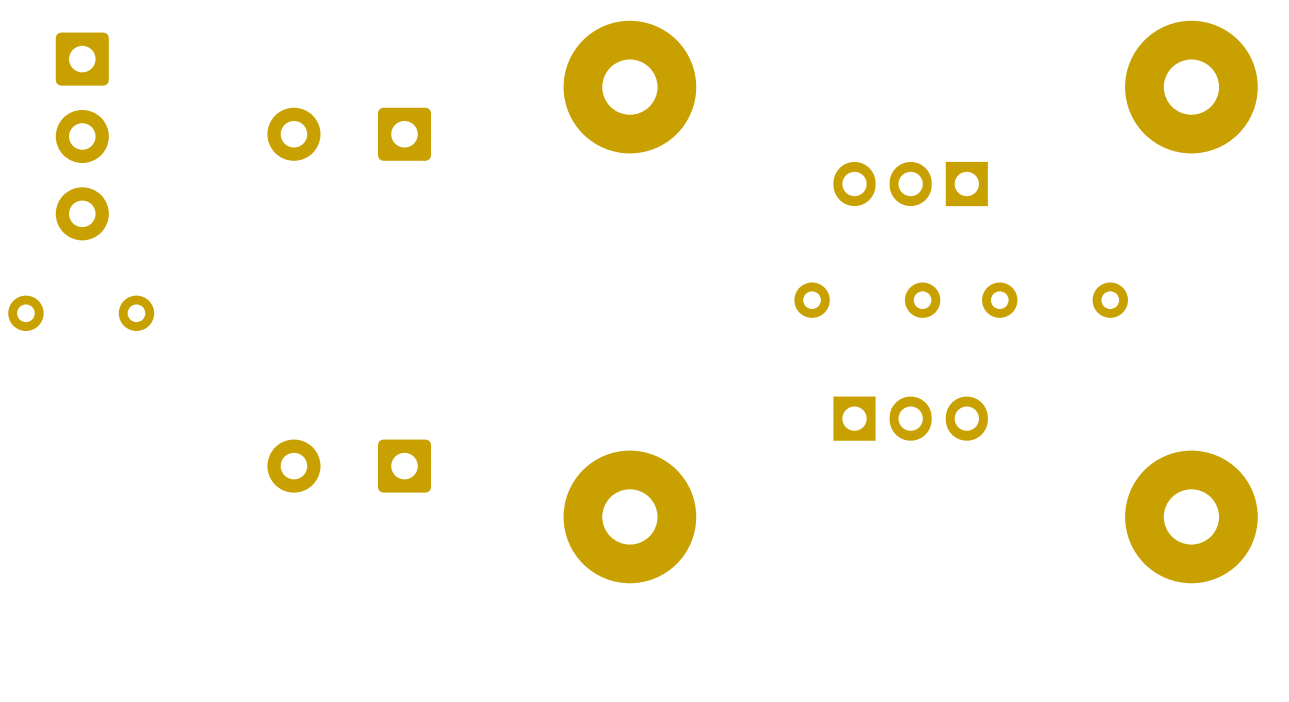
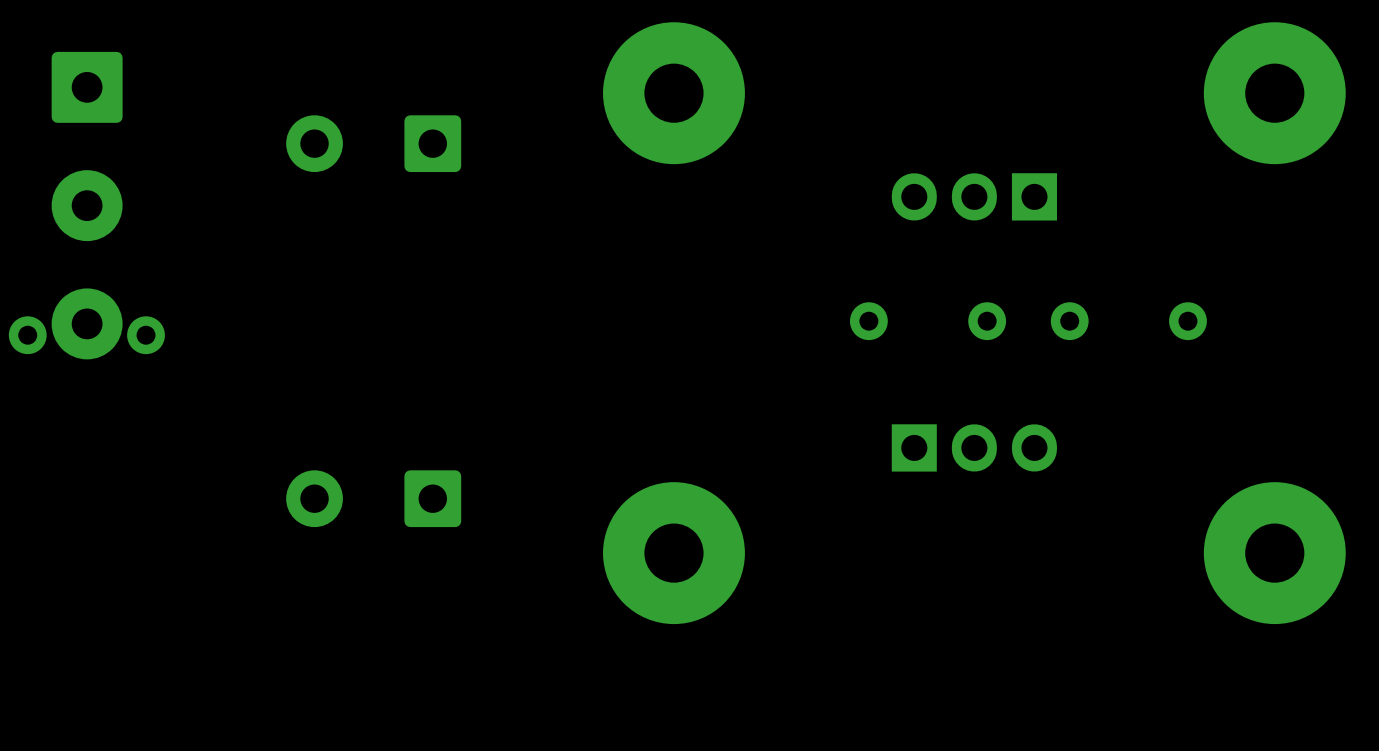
part: (82, 136) -> none
part: none -> (87, 205)

